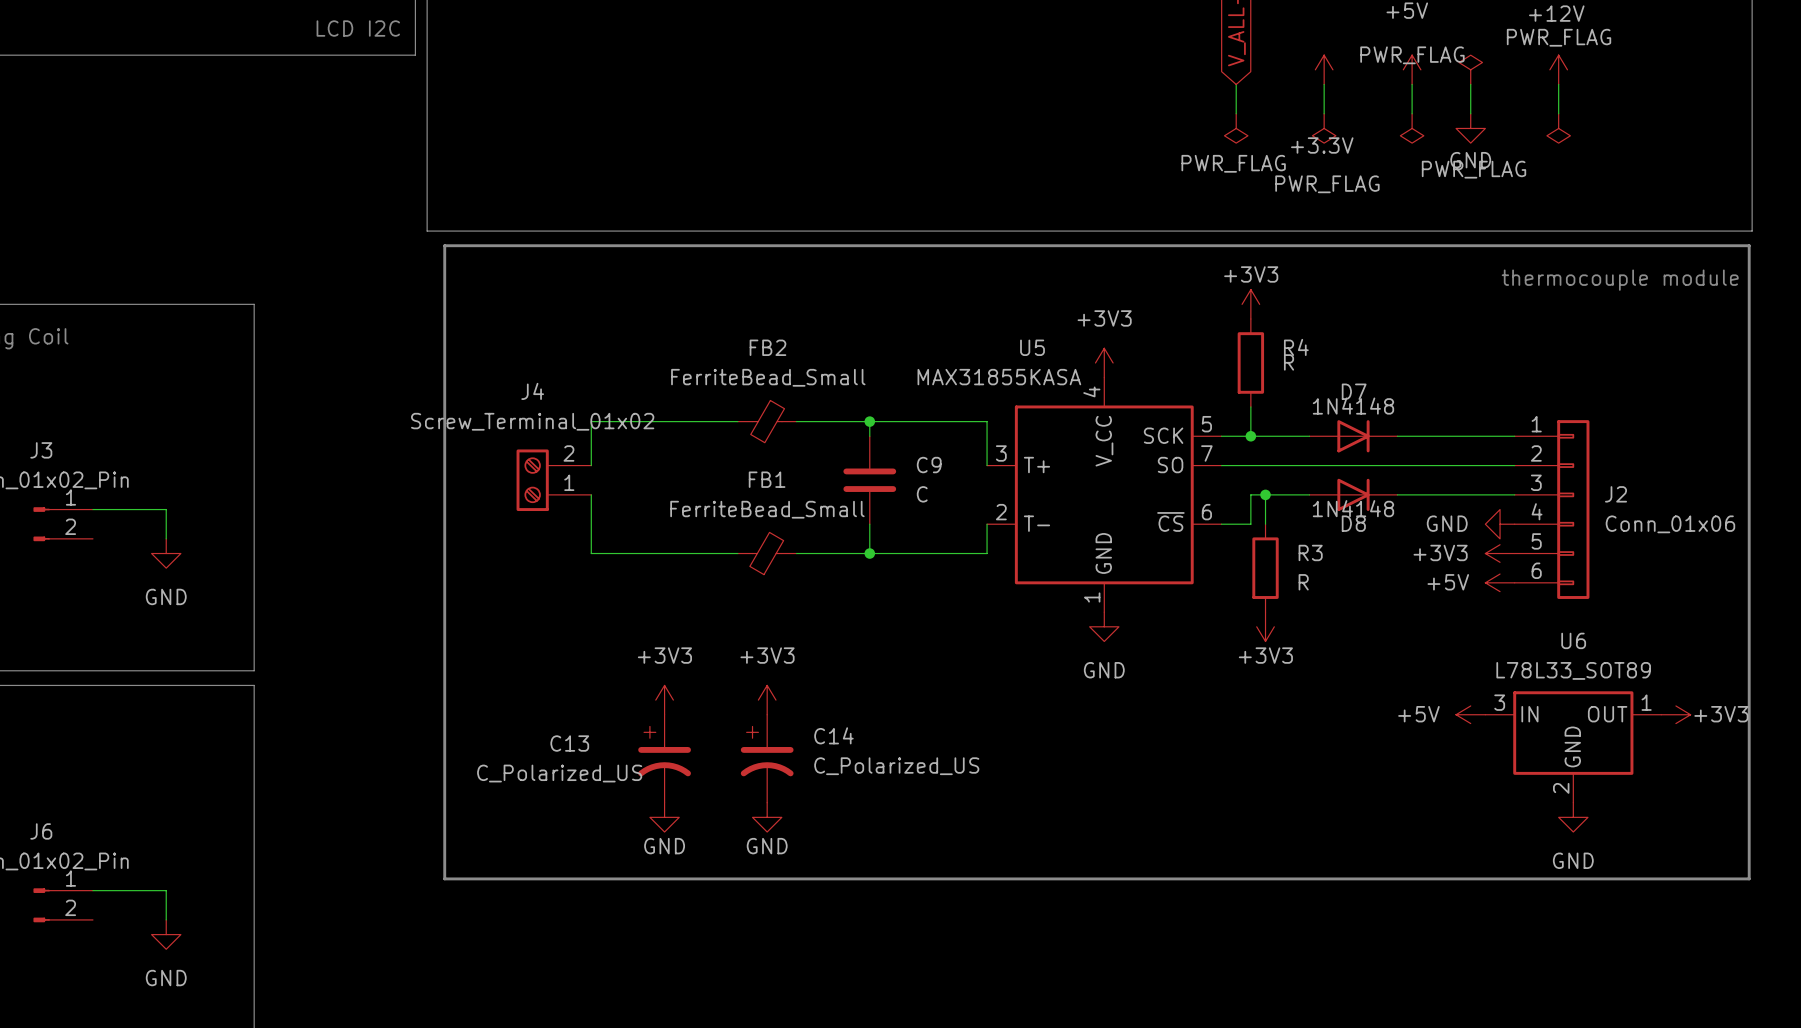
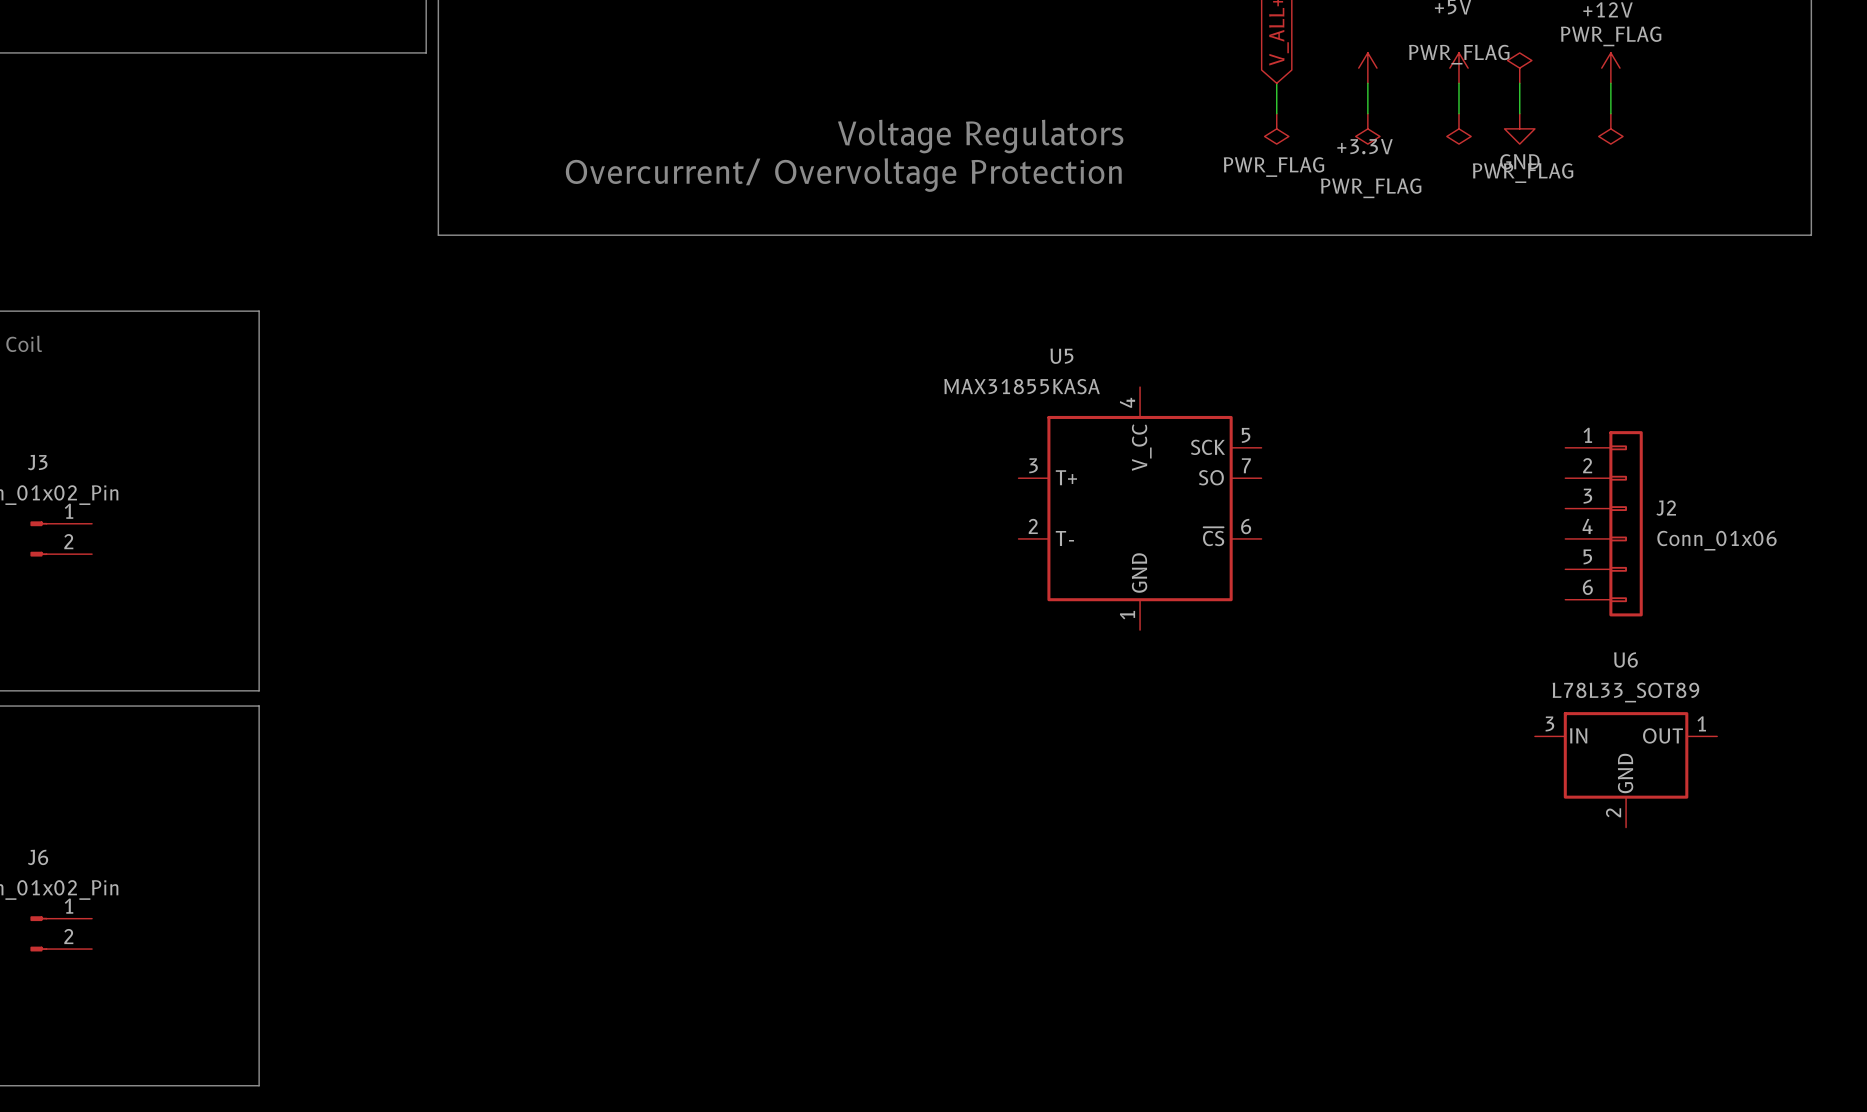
text: LCD I2C (358, 28) -> none
text: none -> Voltage Regulators (980, 136)
text: none -> Overcurrent/ Overvoltage Protection (843, 175)
line: (444, 245) (1749, 245) (1749, 878) (444, 878) (444, 245) -> none
text: thermocouple module (1620, 280) -> none
power symbol: +3V3 (1250, 304) -> none
power symbol: +3V3 (1104, 362) -> none
R4: R (1250, 362) -> none
wire: (1250, 406) (1250, 436) -> none
wire: (737, 421) (591, 421) (591, 465) -> none
FB2: FerriteBead_Small (767, 421) -> none
wire: (796, 421) (987, 421) (987, 465) -> none
wire: (869, 421) (869, 436) -> none
junction: (869, 421) -> none
wire: (1221, 436) (1309, 436) -> none
junction: (1250, 436) -> none
D7: 1N4148 (1353, 436) -> none
wire: (1397, 436) (1514, 436) -> none
wire: (1221, 465) (1514, 465) -> none
J4: Screw_Terminal_01x02 (553, 480) -> none
C9: C (869, 480) -> none
wire: (591, 494) (591, 553) (737, 553) -> none
wire: (1265, 494) (1265, 524) -> none
junction: (1265, 494) -> none
wire: (1309, 494) (1250, 494) (1250, 524) (1221, 524) -> none
D8: 1N4148 (1353, 494) -> none
wire: (1397, 494) (1514, 494) -> none
wire: (92, 509) (166, 509) (166, 538) -> none
wire: (869, 524) (869, 553) -> none
wire: (987, 524) (987, 553) (796, 553) -> none
power symbol: GND (1500, 524) -> none
power symbol: GND (166, 553) -> none
FB1: FerriteBead_Small (767, 553) -> none
junction: (869, 553) -> none
power symbol: +3V3 (1500, 553) -> none
R3: R (1265, 568) -> none
power symbol: +5V (1500, 582) -> none
power symbol: GND (1104, 626) -> none
power symbol: +3V3 (1265, 626) -> none
power symbol: +3V3 (664, 700) -> none
power symbol: +3V3 (767, 700) -> none
power symbol: +5V (1470, 714) -> none
power symbol: +3V3 (1675, 714) -> none
C13: C_Polarized_US (664, 758) -> none
C14: C_Polarized_US (767, 758) -> none
power symbol: GND (664, 817) -> none
power symbol: GND (767, 817) -> none
power symbol: GND (1573, 817) -> none
wire: (92, 890) (166, 890) (166, 919) -> none
power symbol: GND (166, 934) -> none

